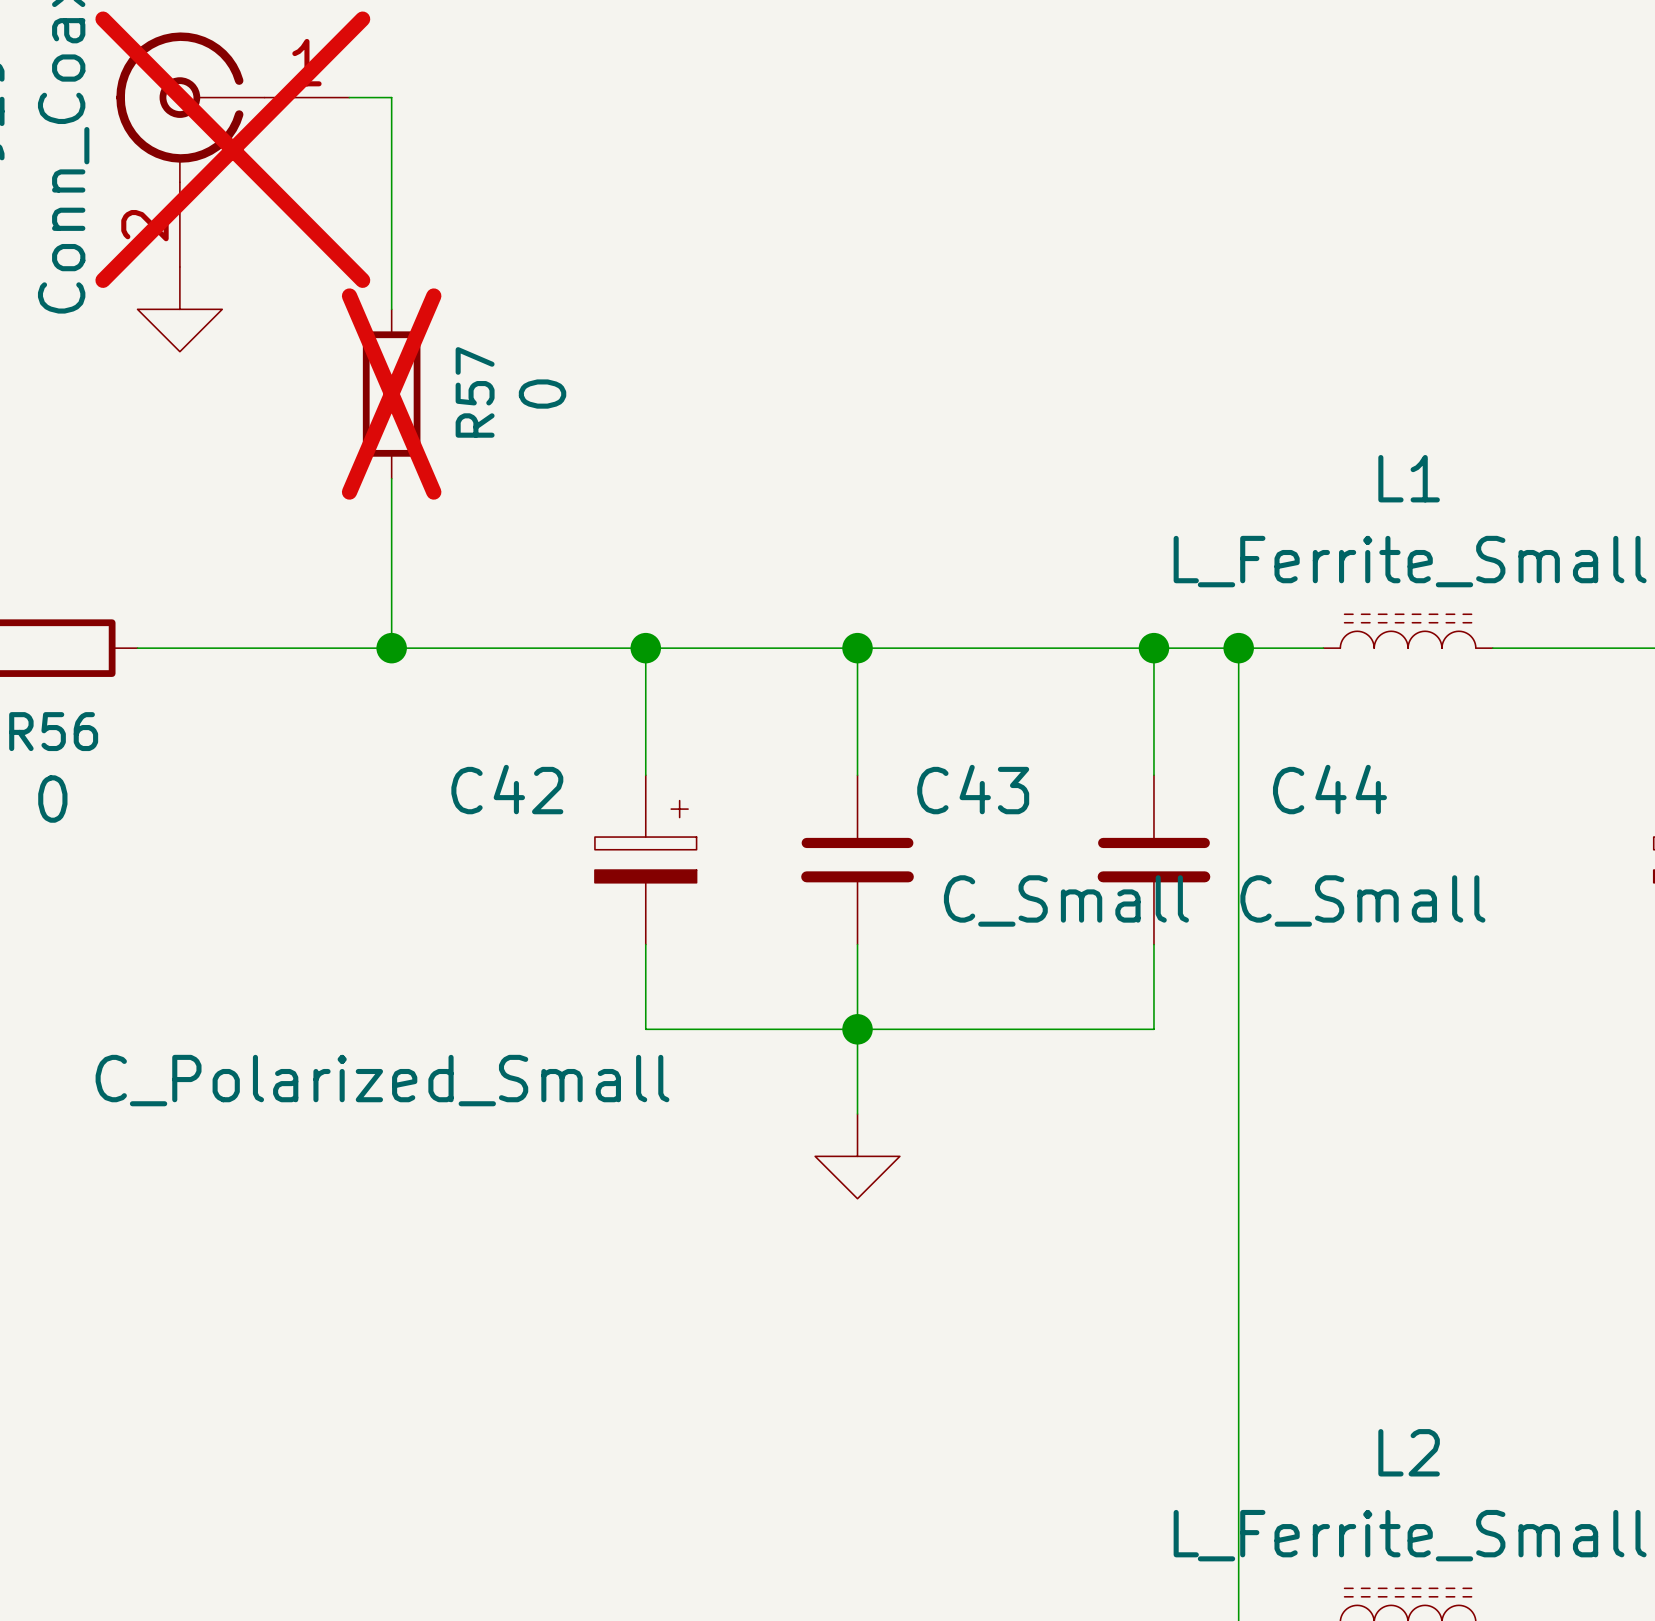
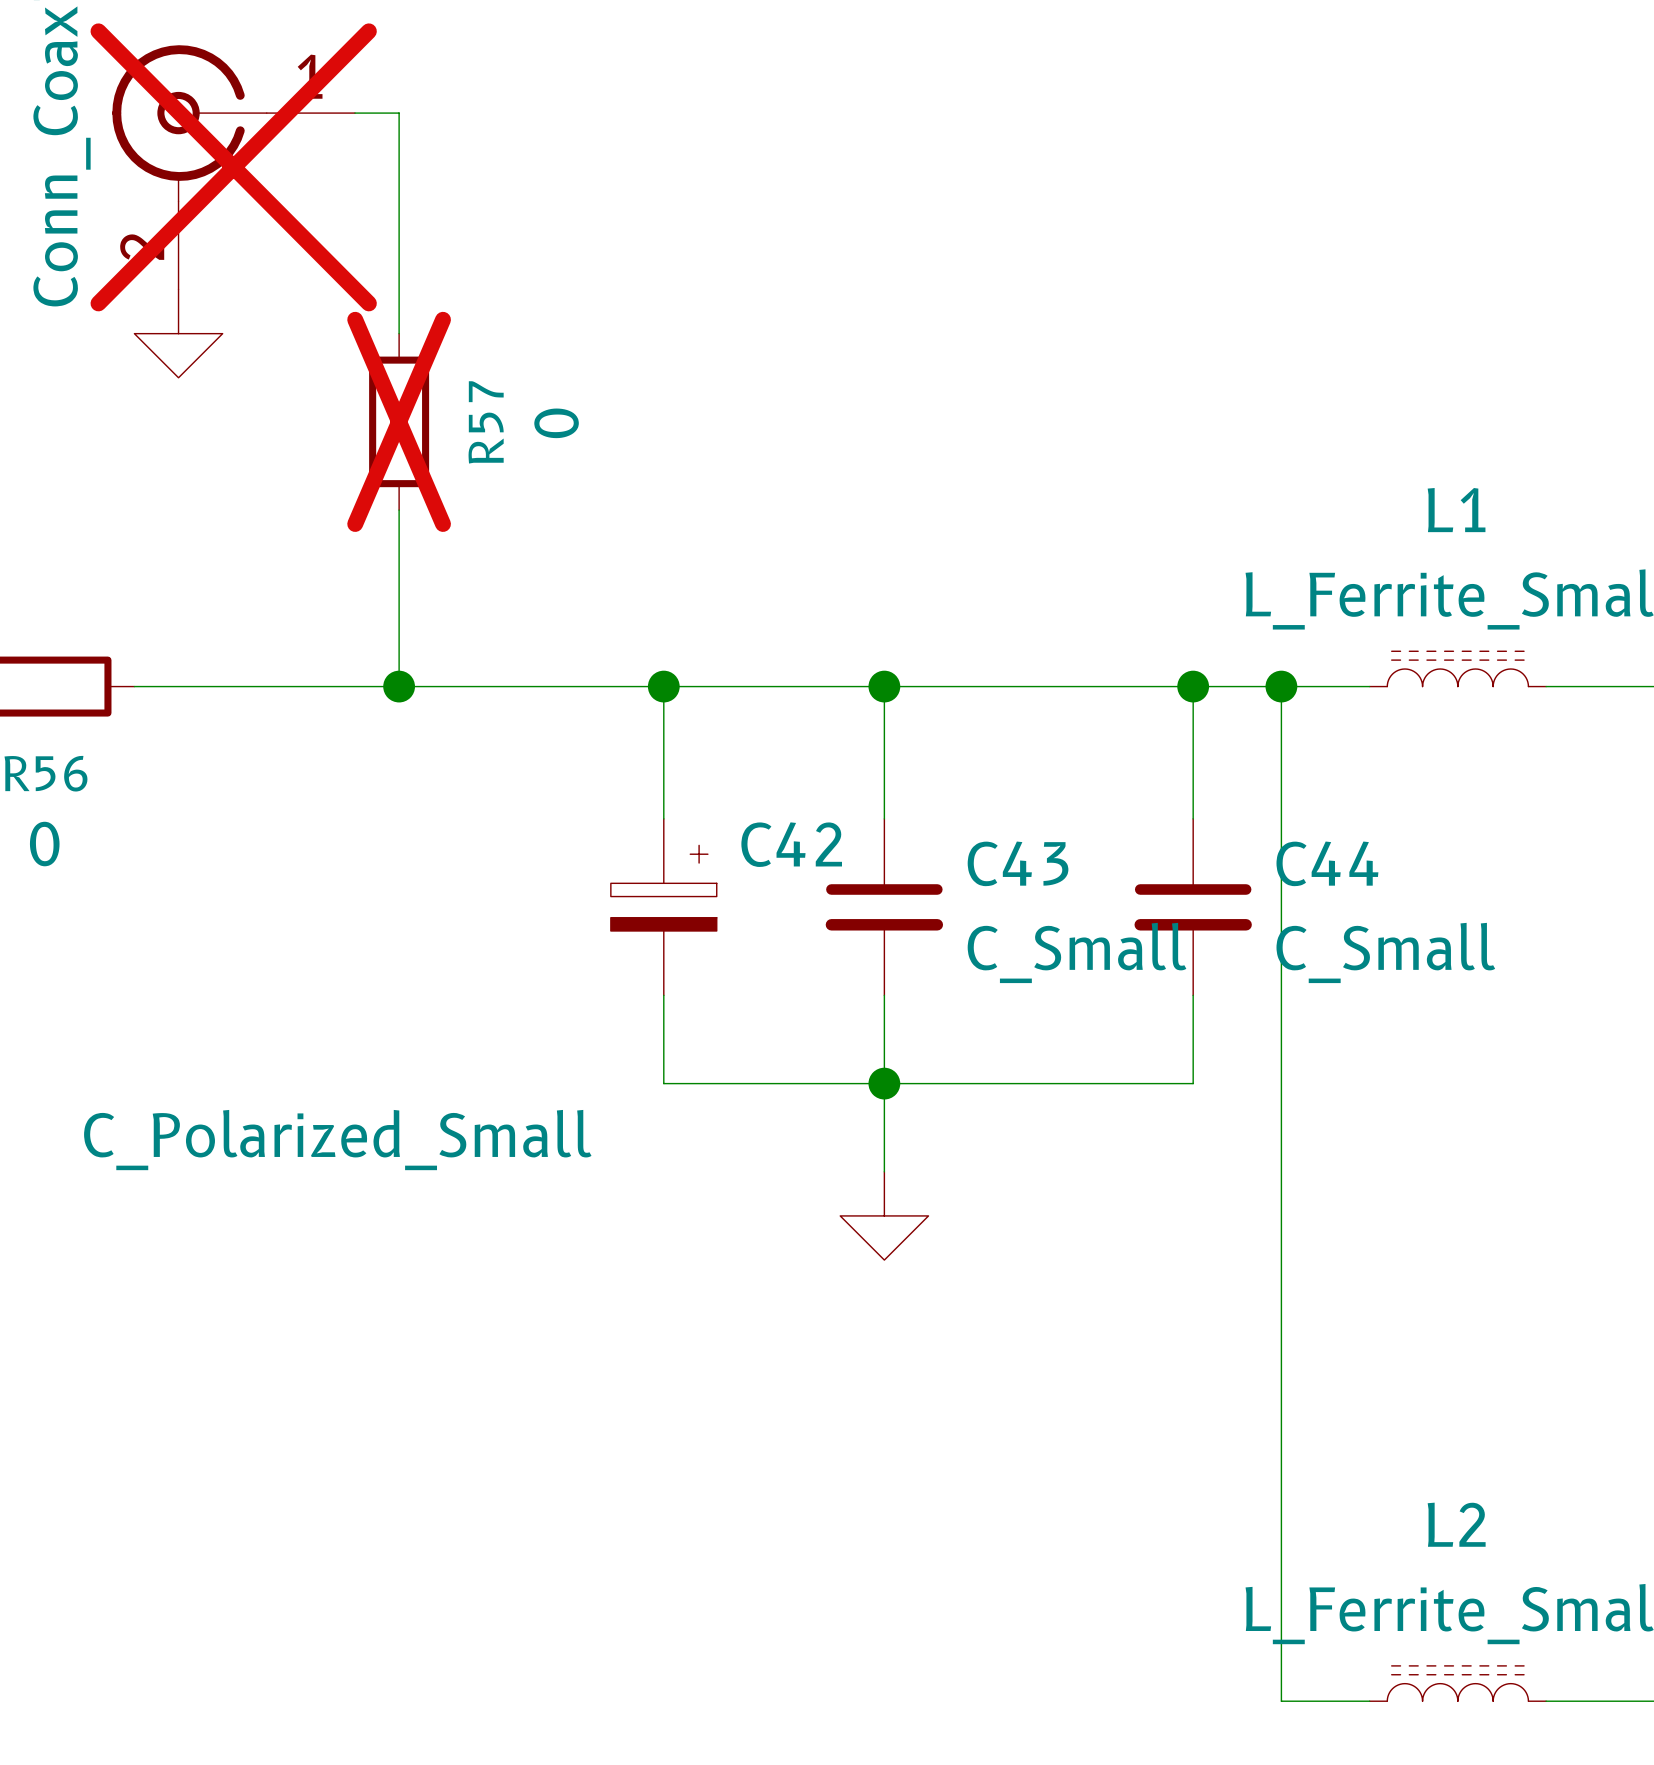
C42 name position: C42 (507, 789) -> C42 (791, 844)
C43 name position: C43 (973, 789) -> C43 (1018, 863)
C44 name position: C44 (1329, 789) -> C44 (1327, 863)

